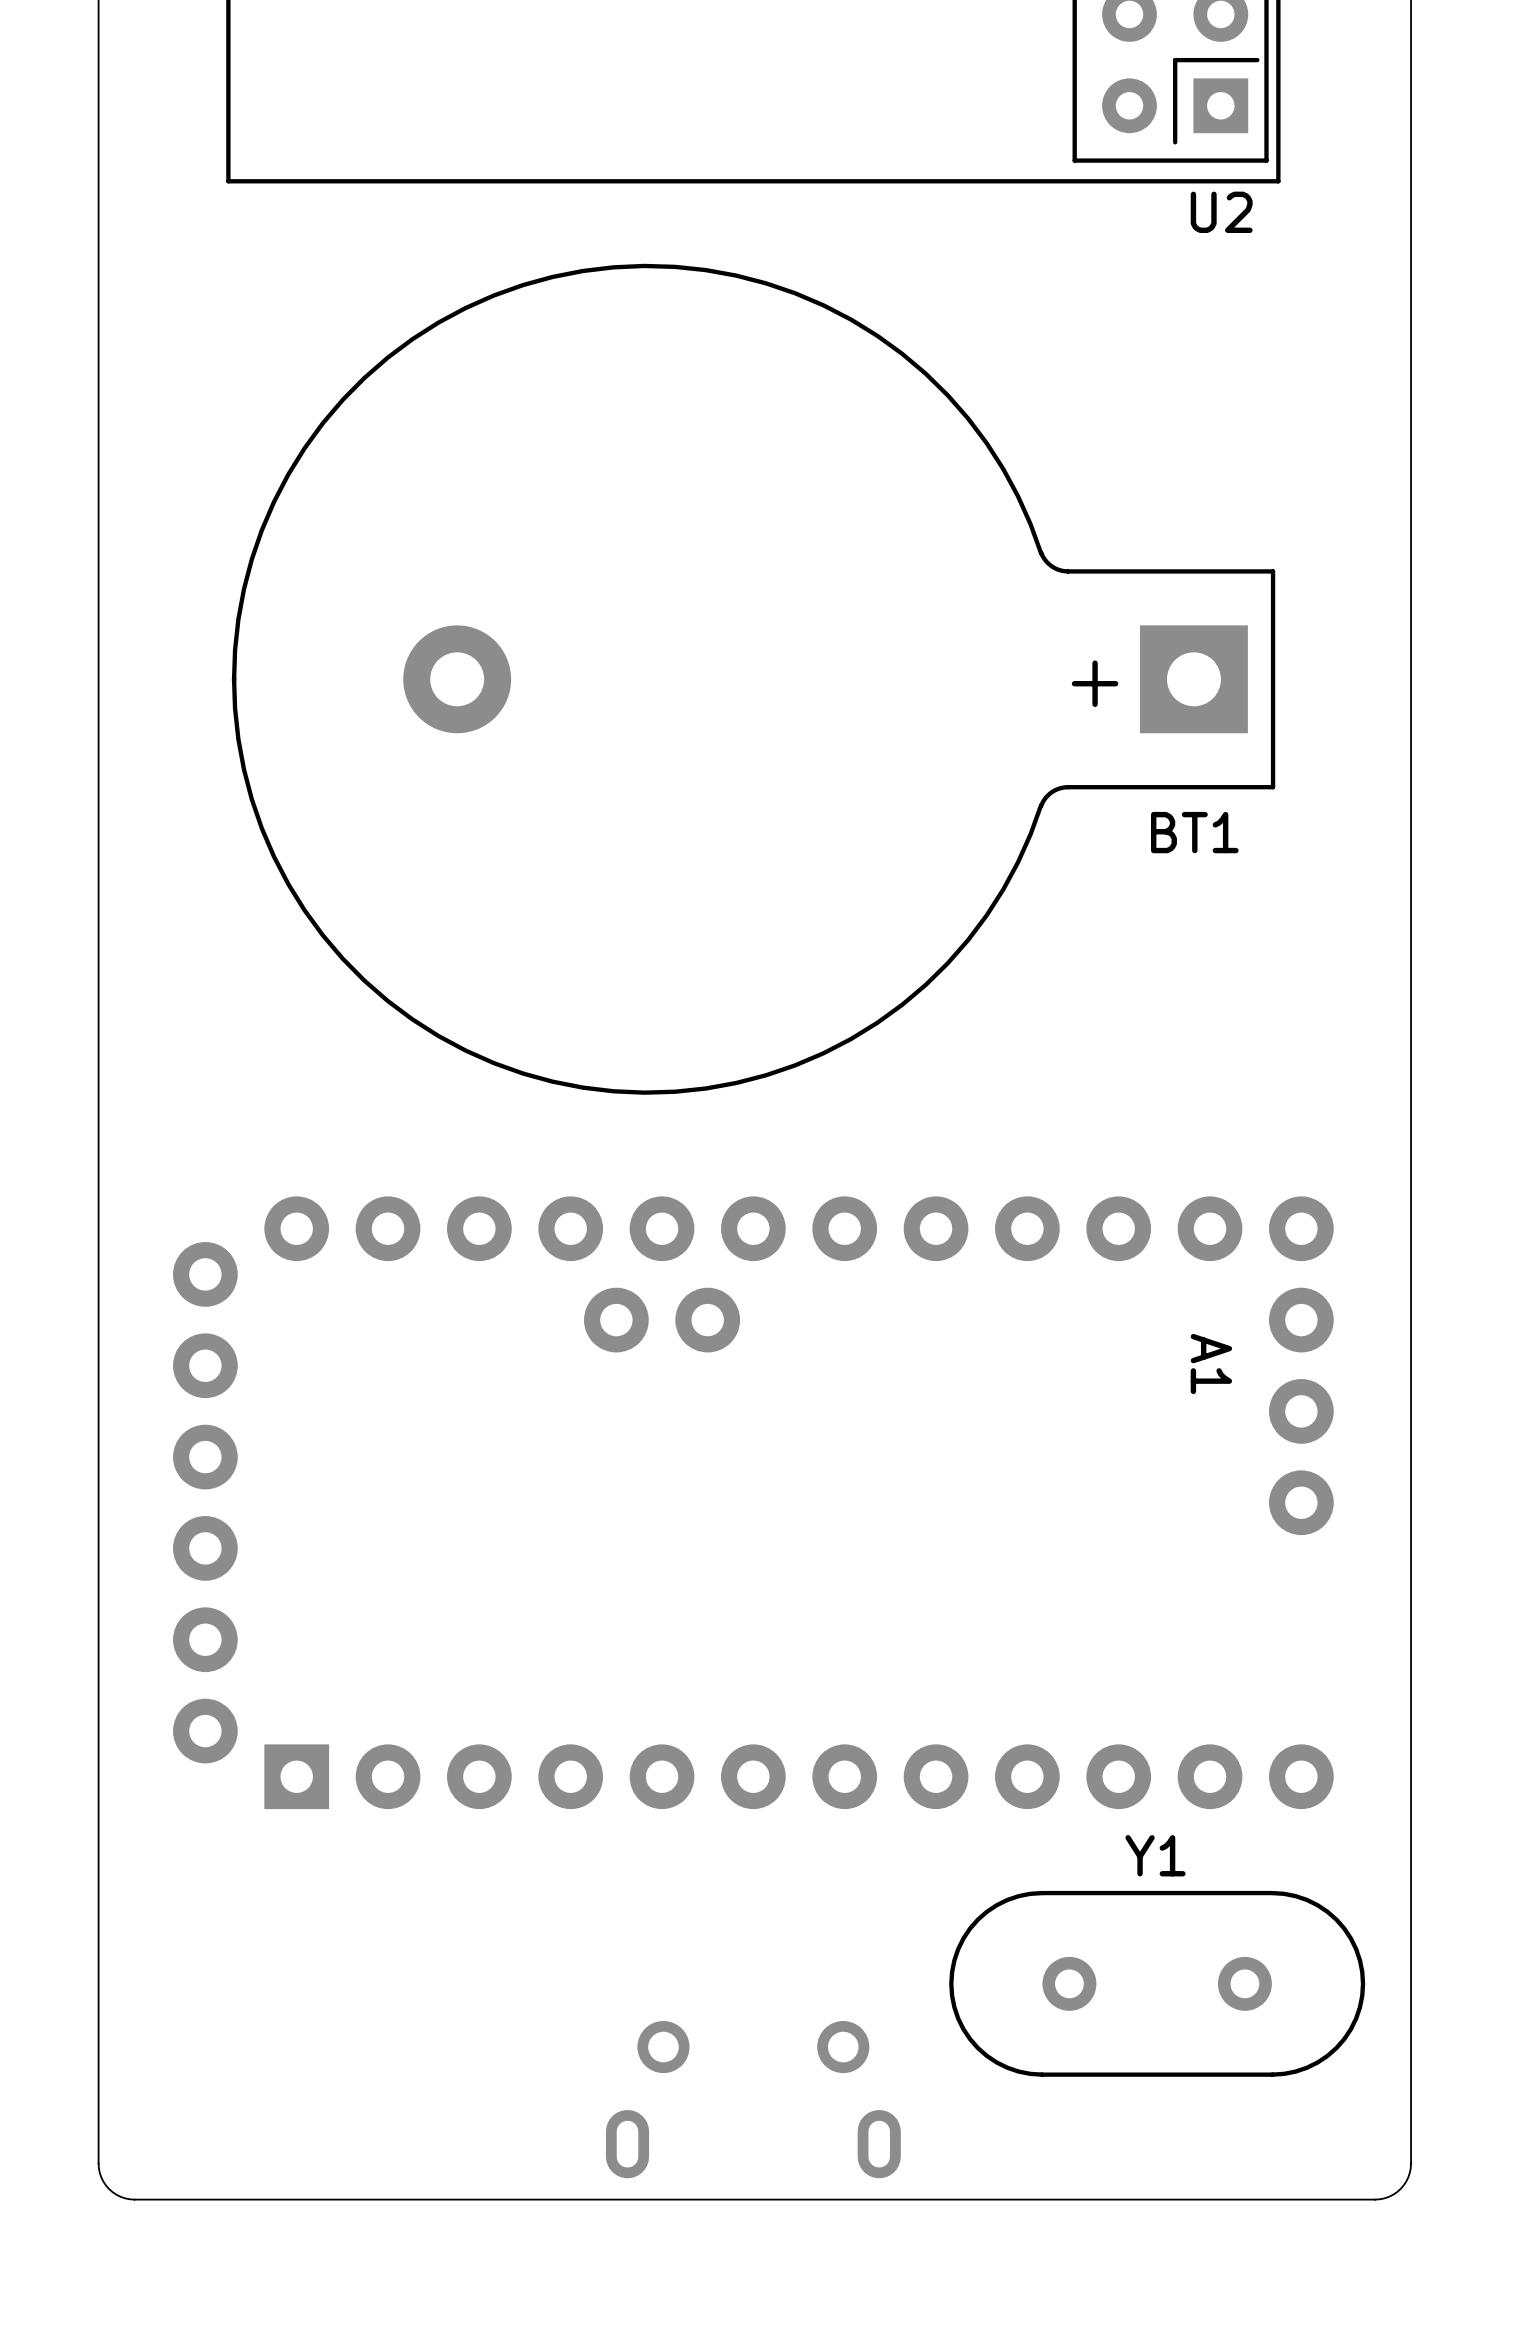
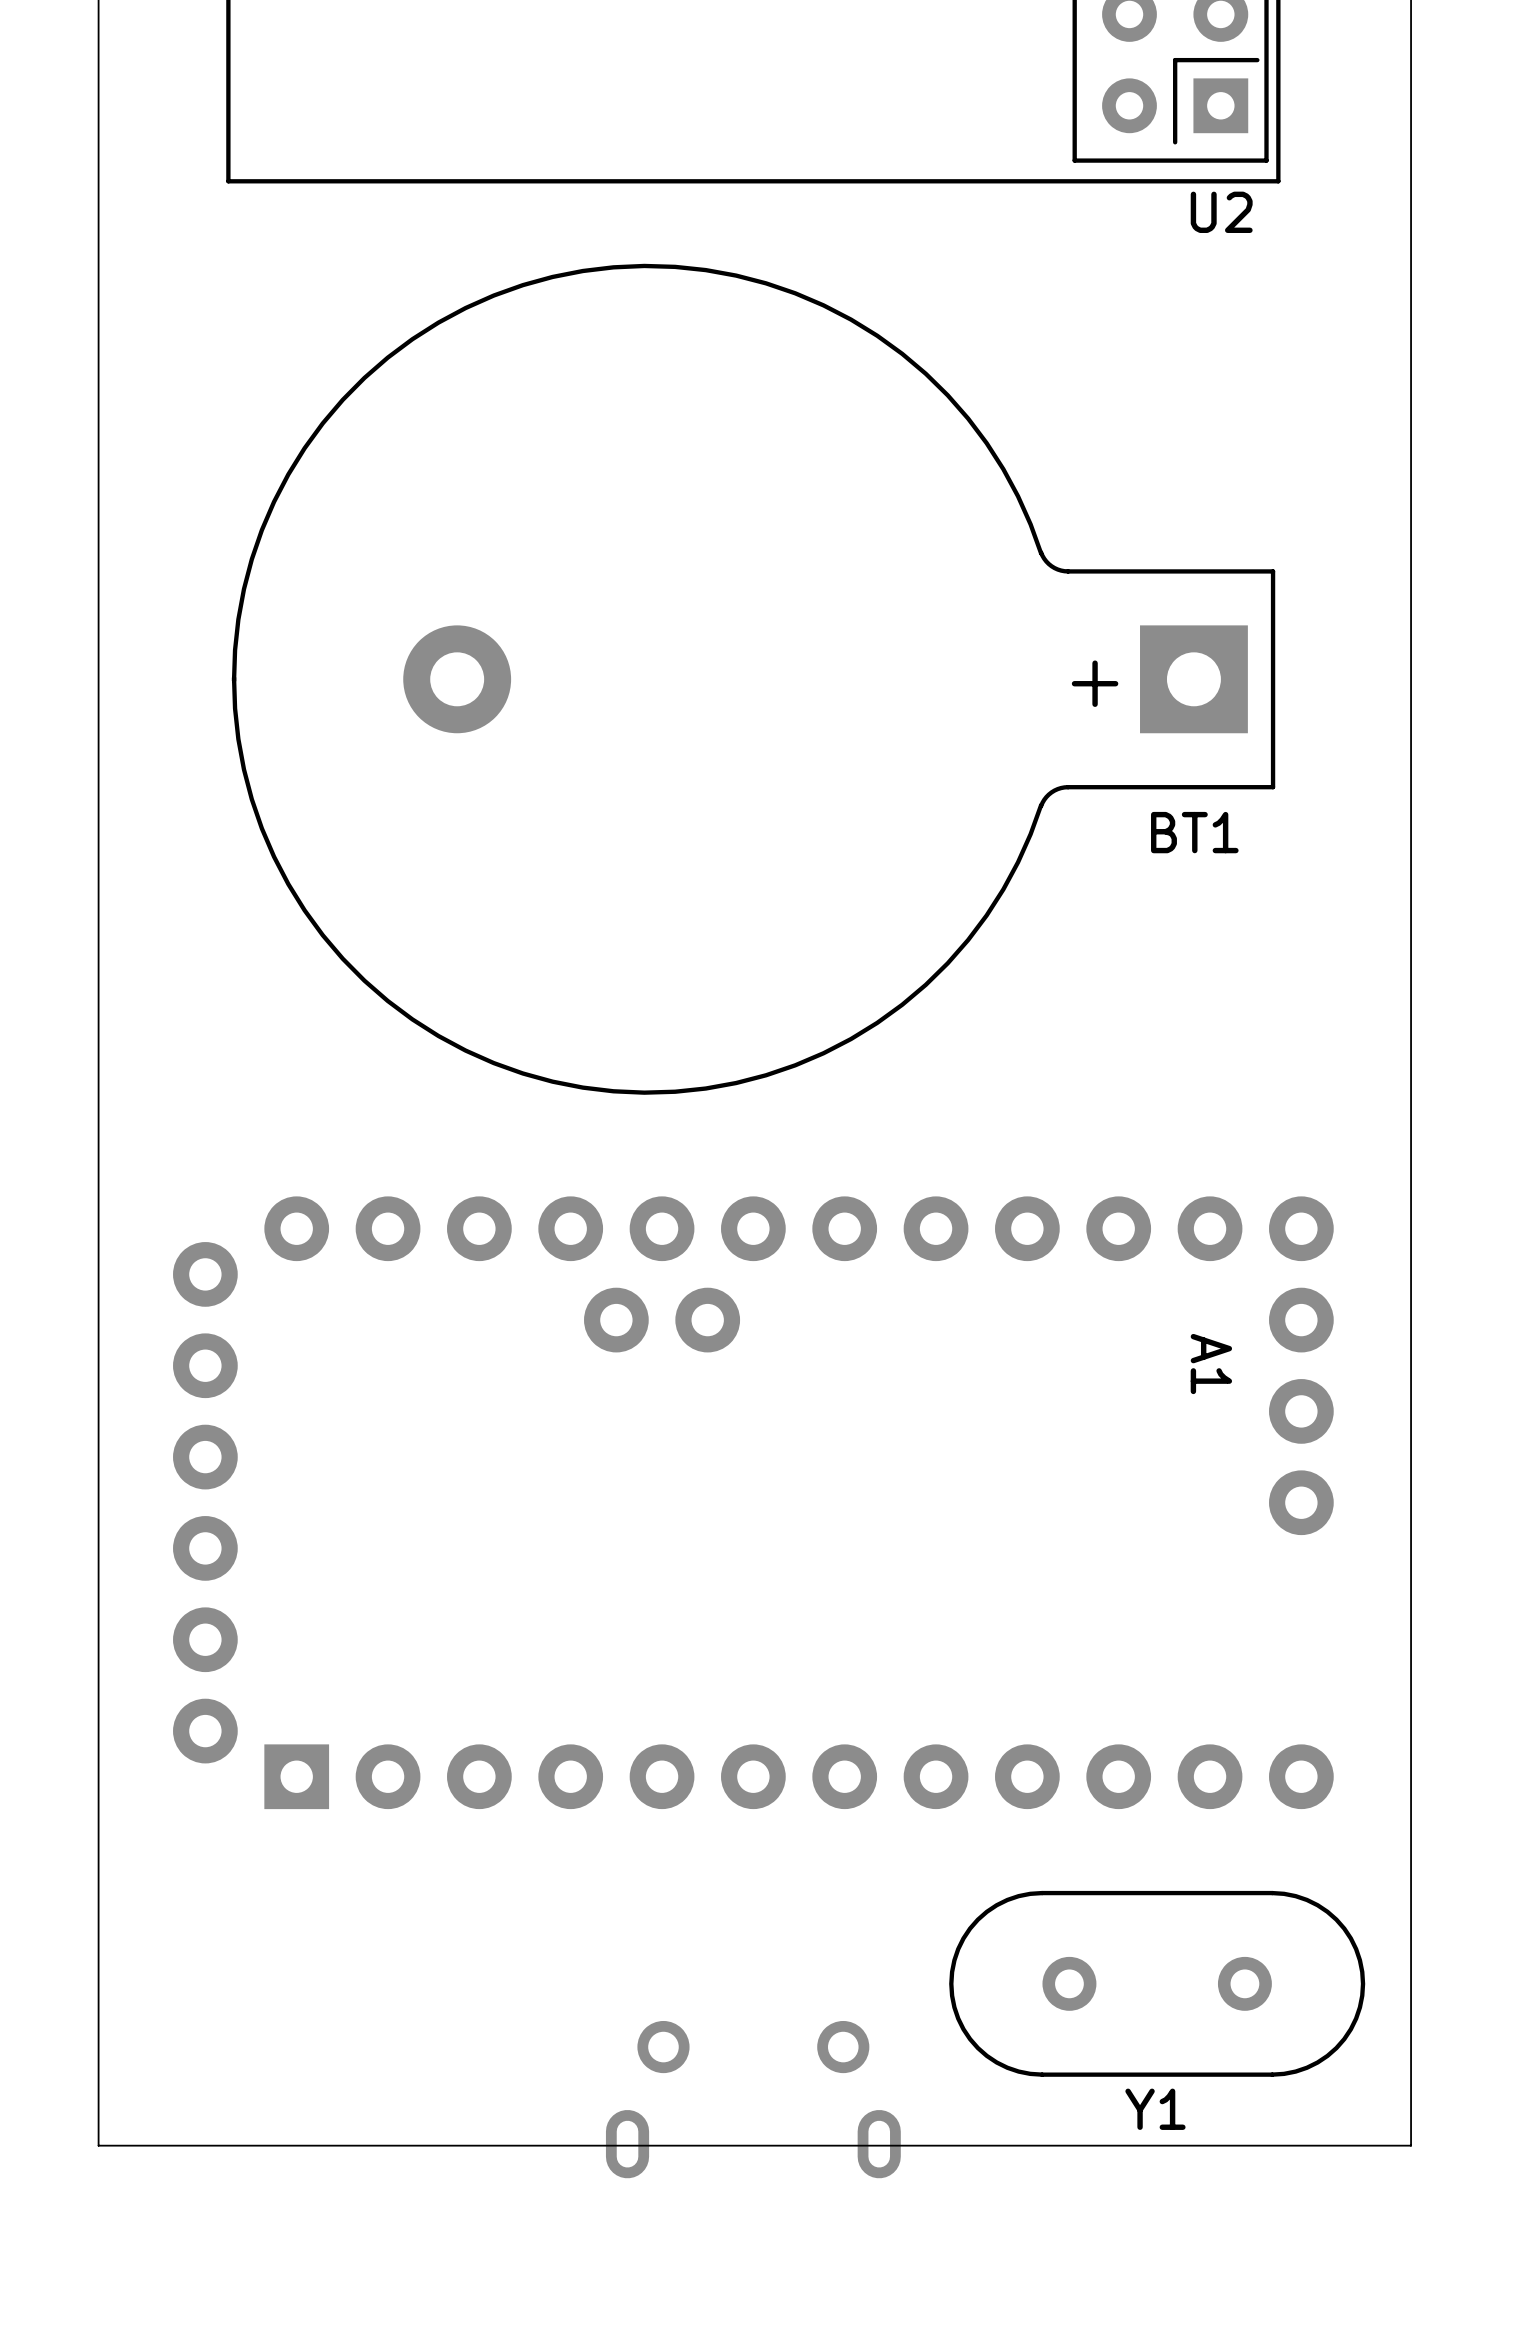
Y1 name position: Y1 (1155, 1855) -> Y1 (1155, 2109)
board edge: (1411, 2145) (1410, 2168) (1406, 2181) (1393, 2194) (1375, 2199) (134, 2199) (116, 2194) (103, 2181) (98, 2168) (98, 2145) -> (1411, 2145) (98, 2145)

